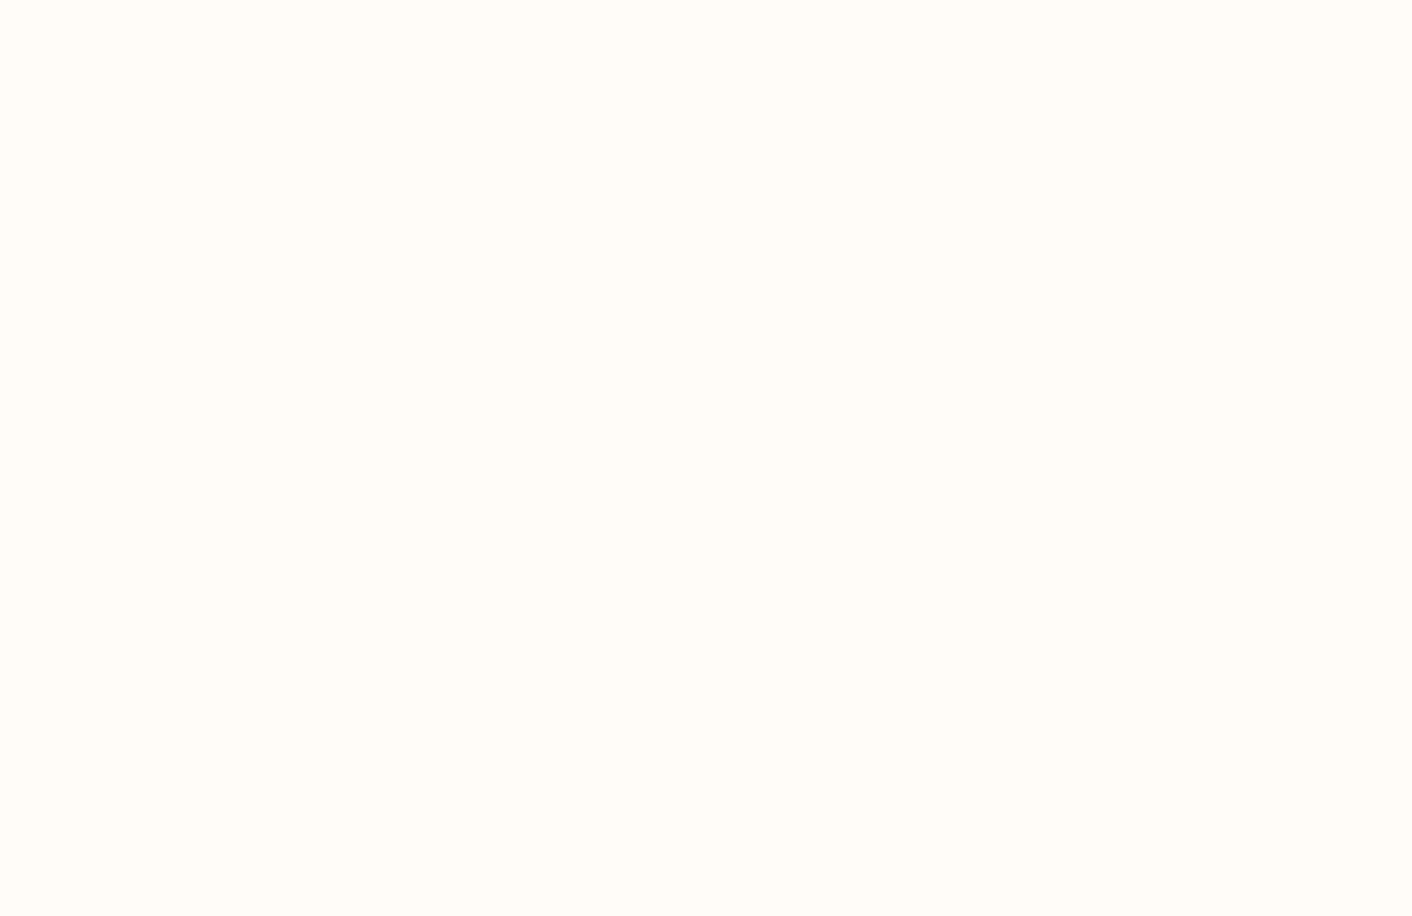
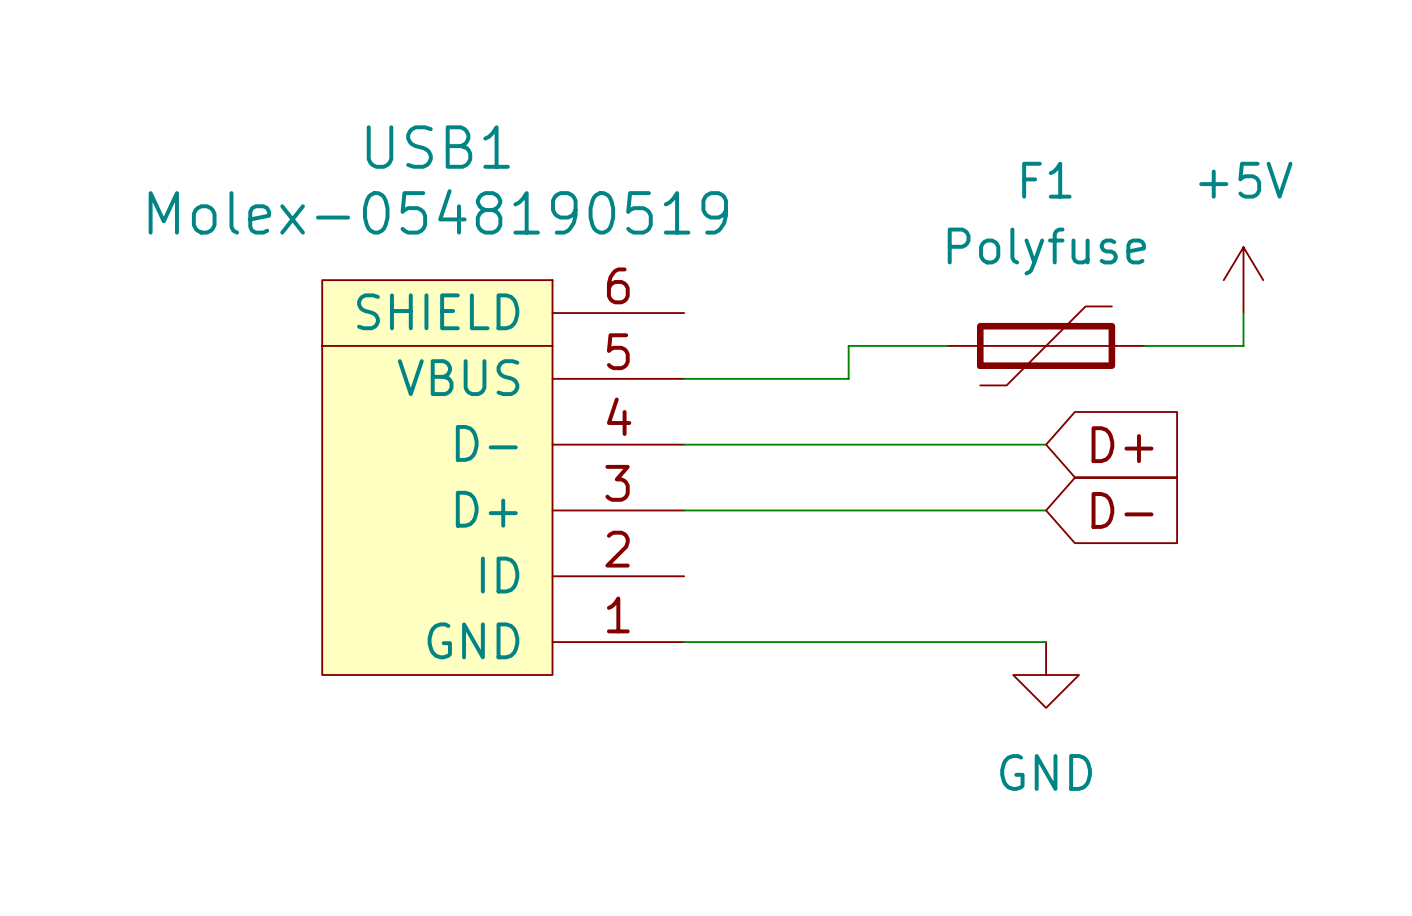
power symbol: none -> +5V (1243, 280)
wire: none -> (1243, 313) (1243, 345) (1144, 345)
wire: none -> (947, 345) (848, 345) (848, 378) (684, 378)
F1: none -> Polyfuse (1046, 345)
wire: none -> (684, 444) (1046, 444)
global label: none -> D+ (1122, 444)
USB1: none -> Molex-0548190519 (503, 477)
wire: none -> (684, 510) (1046, 510)
global label: none -> D- (1122, 510)
wire: none -> (684, 642) (1046, 642)
power symbol: none -> GND (1046, 674)

